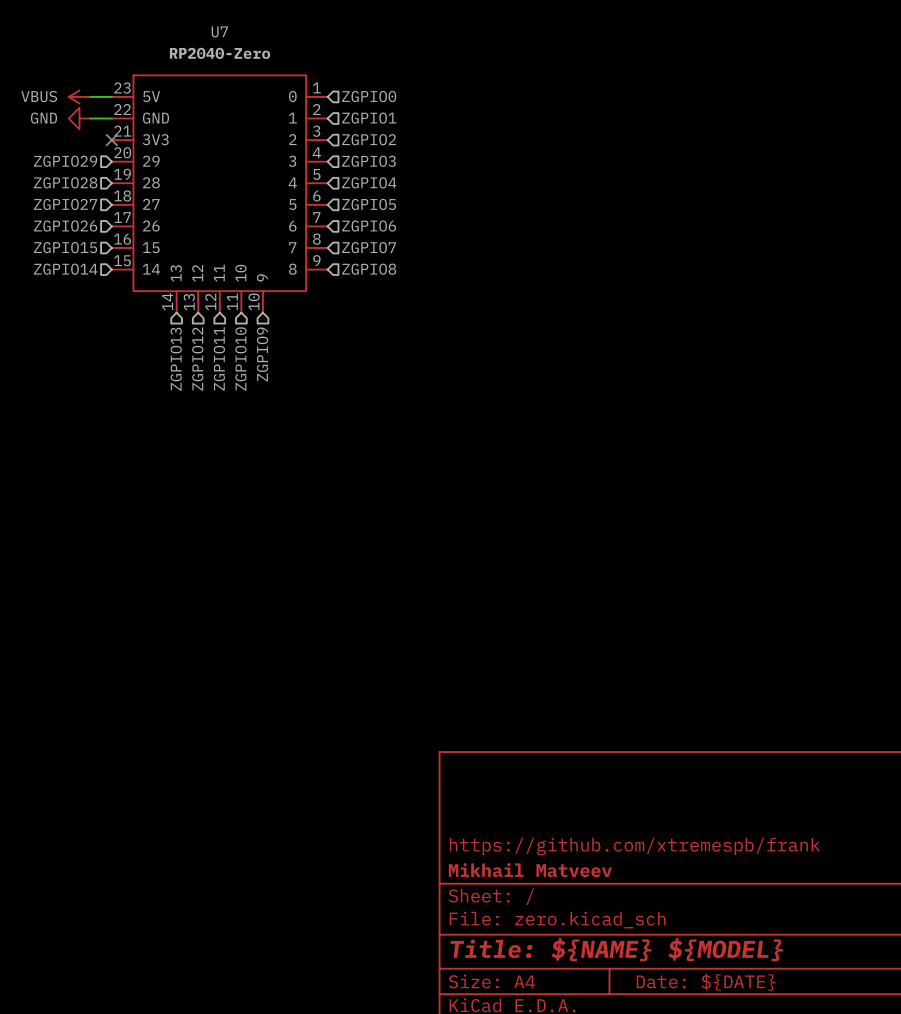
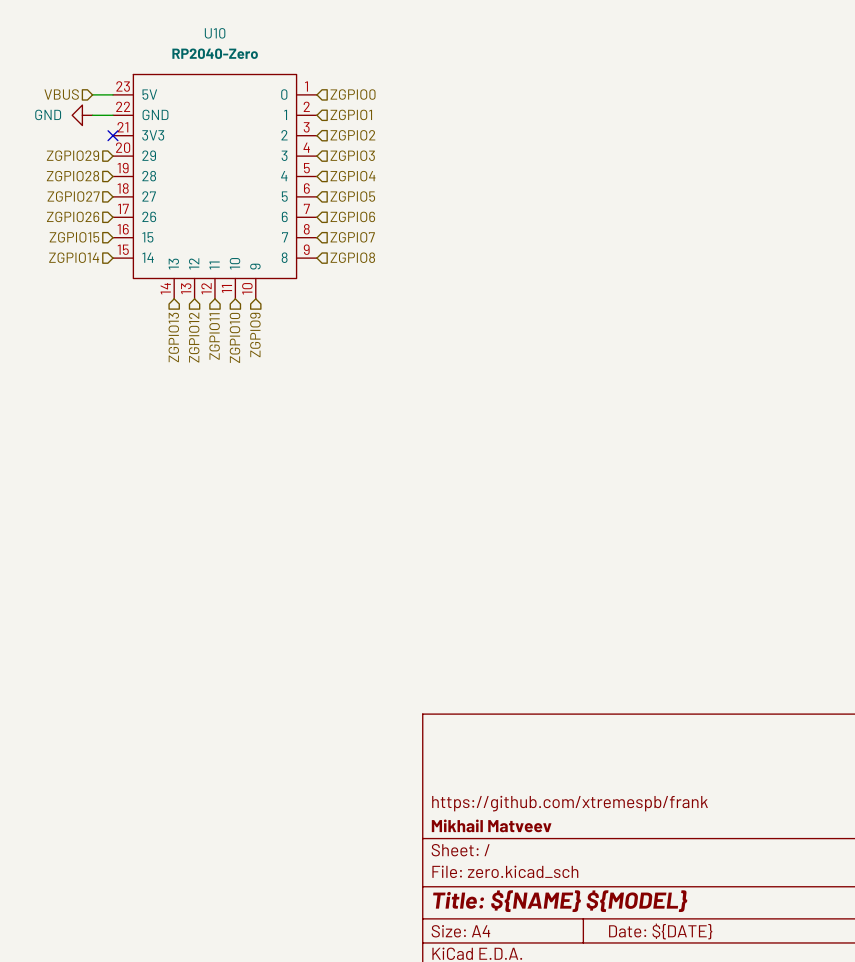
U7 name: U7 (219, 31) -> U10 (215, 33)
hierarchical label: none -> VBUS (61, 94)
power symbol: VBUS (79, 96) -> none

